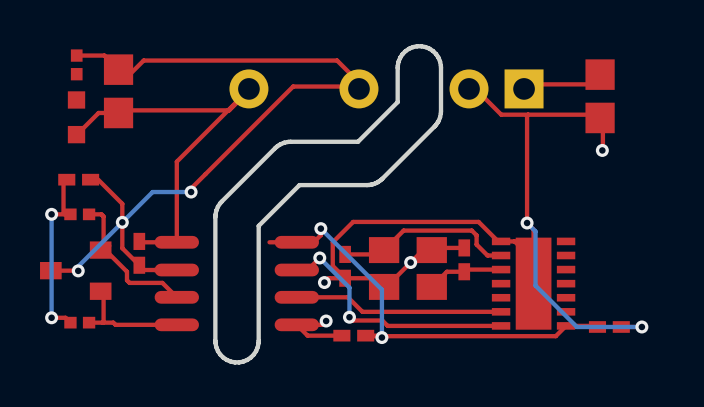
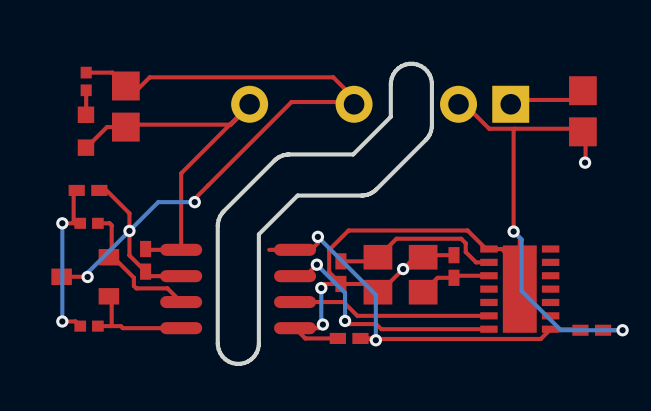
top track: none -> (86, 90) (86, 114)
bottom track: none -> (321, 288) (321, 322) (322, 324)

